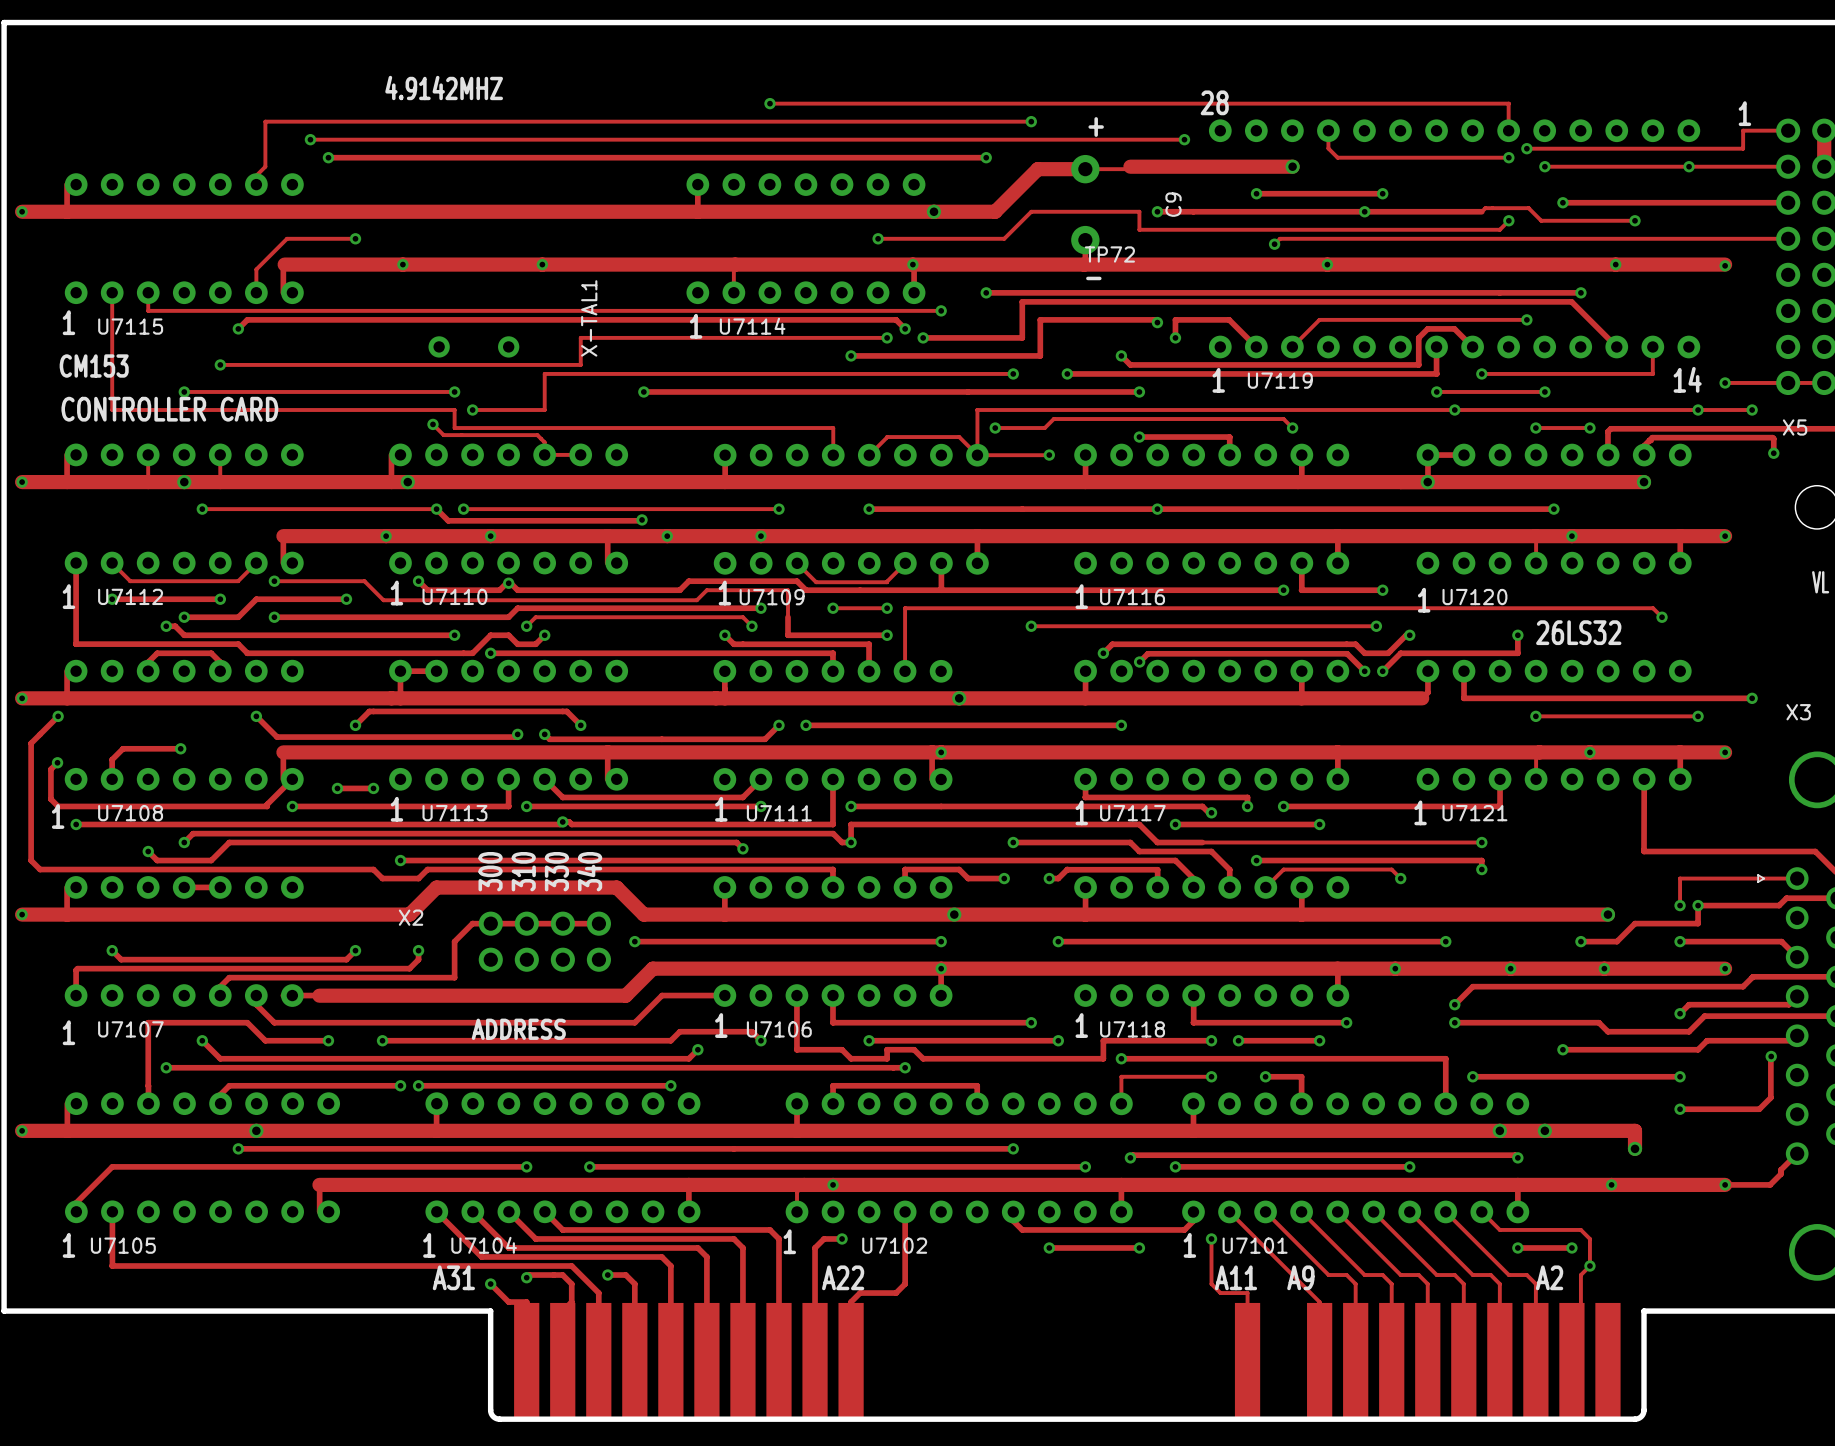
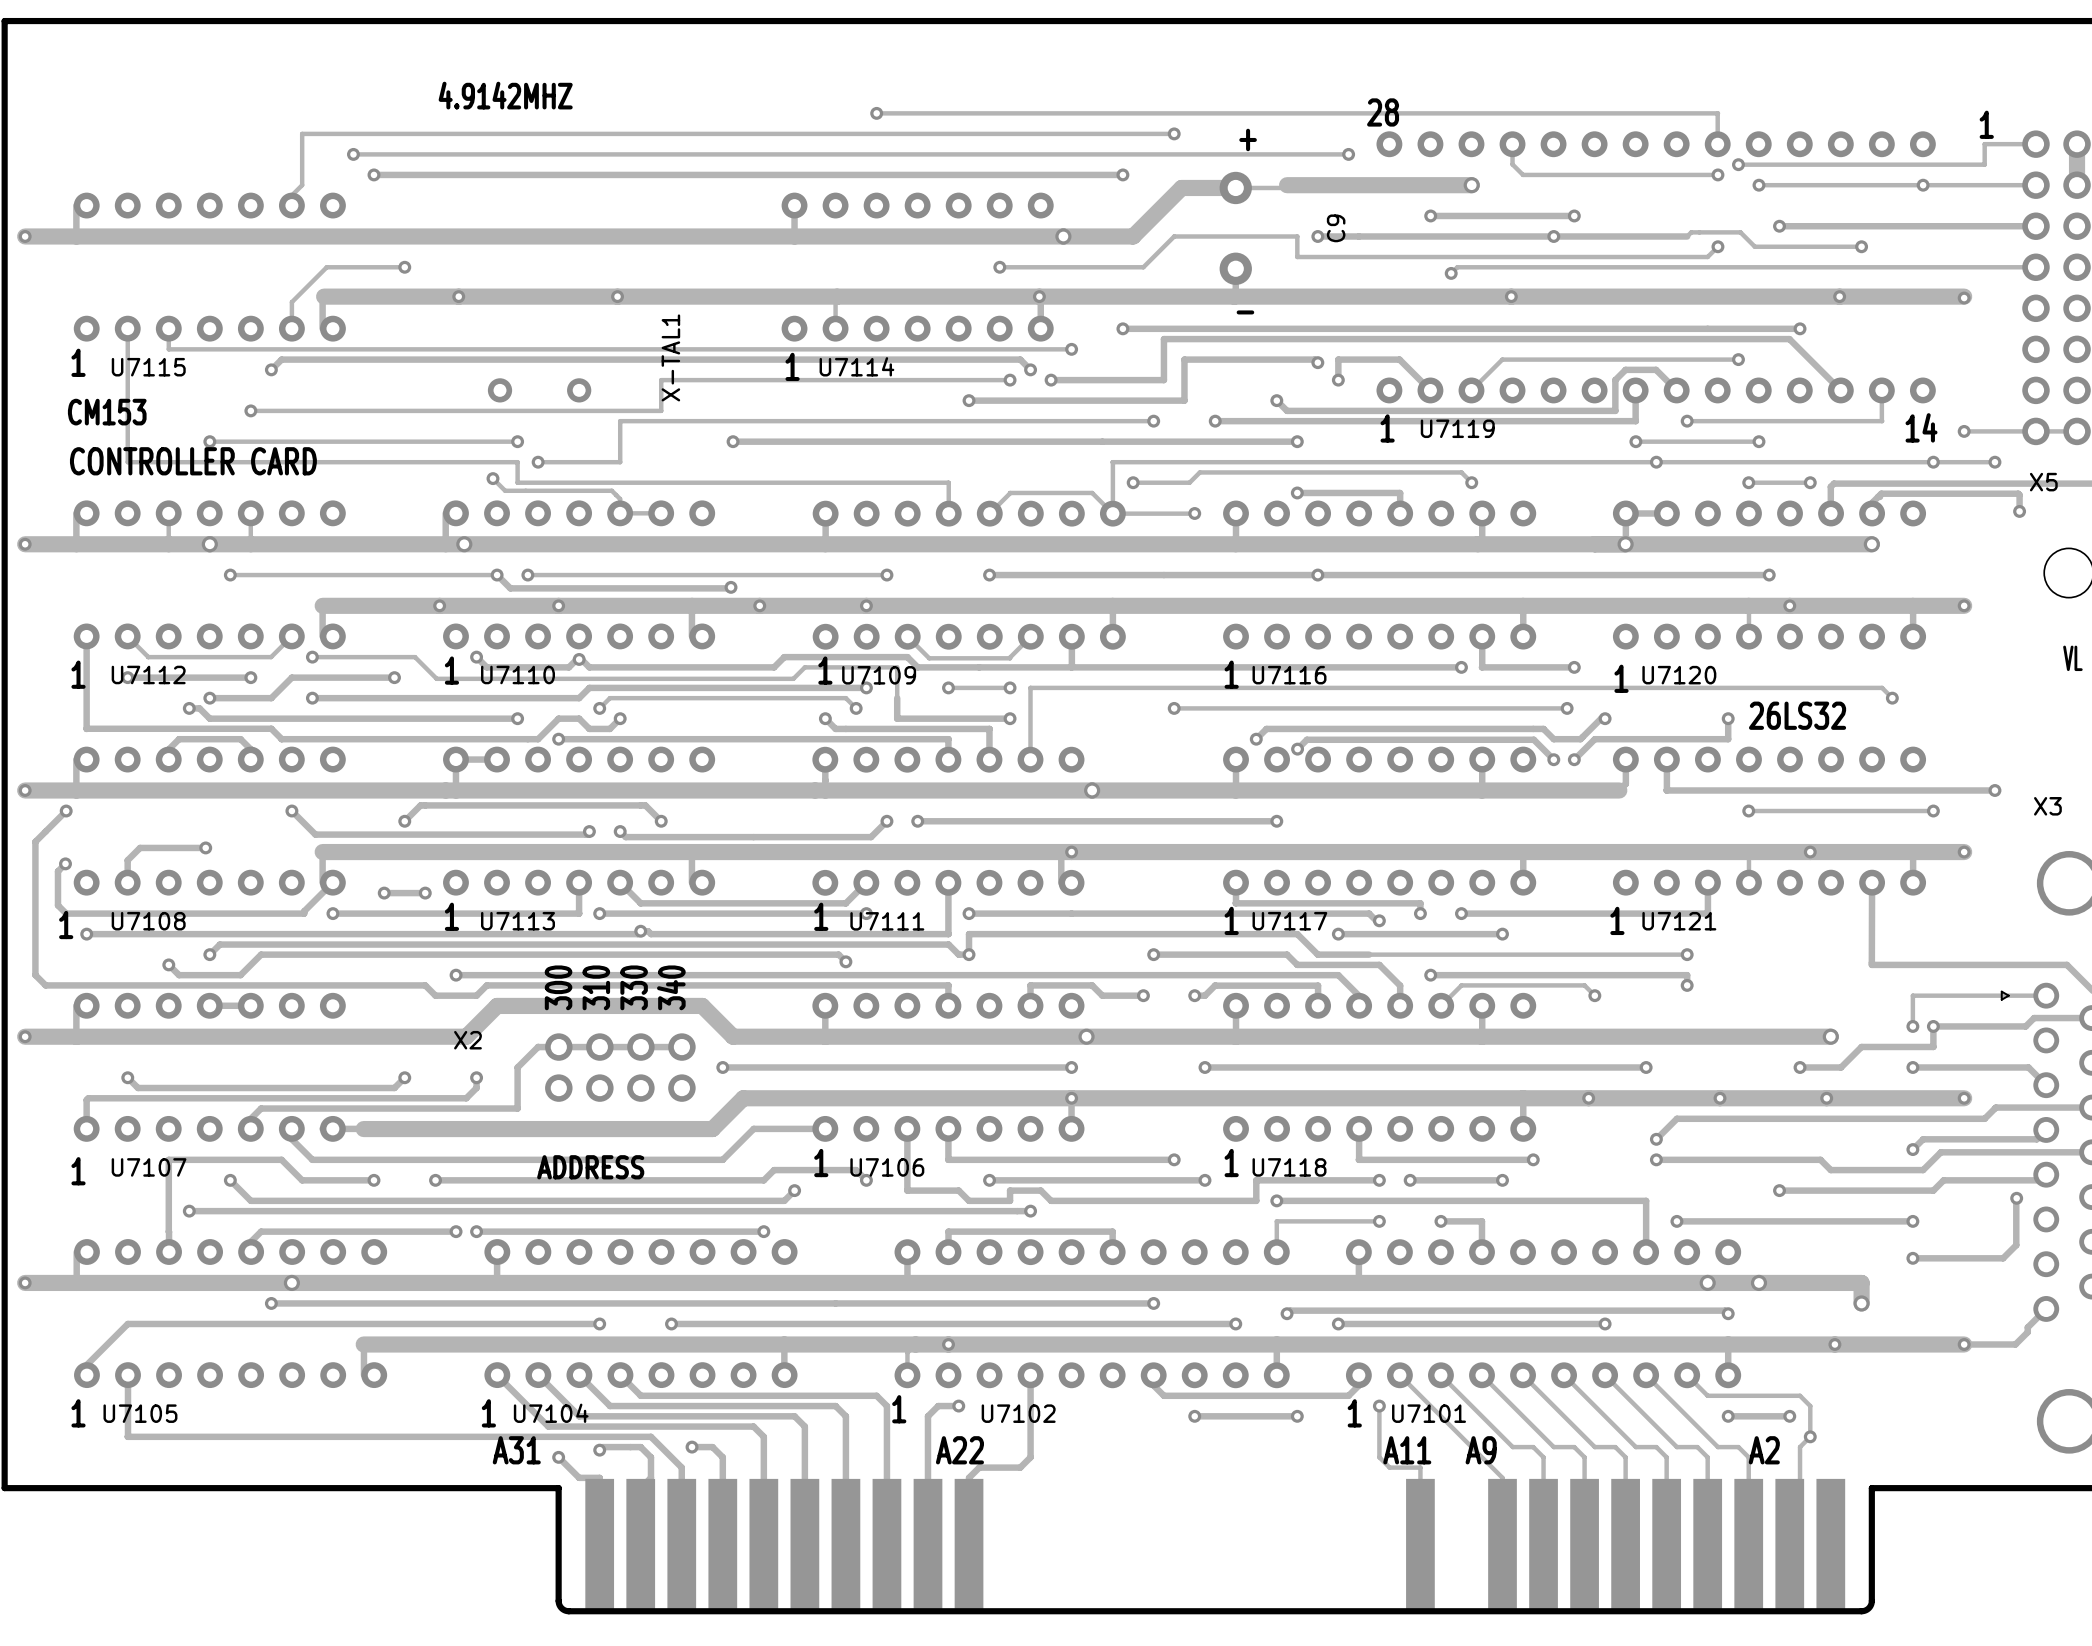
TP72: (1109, 254) -> none

